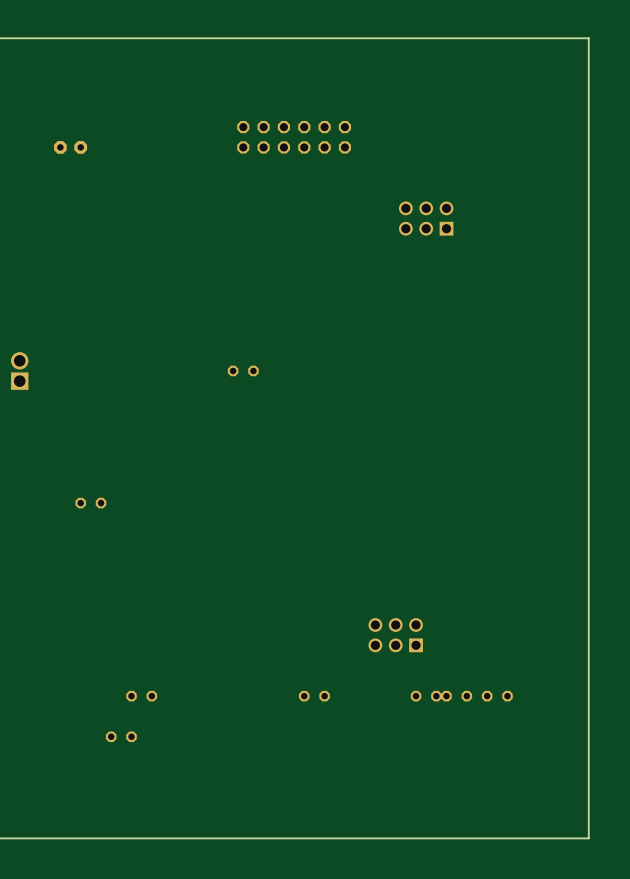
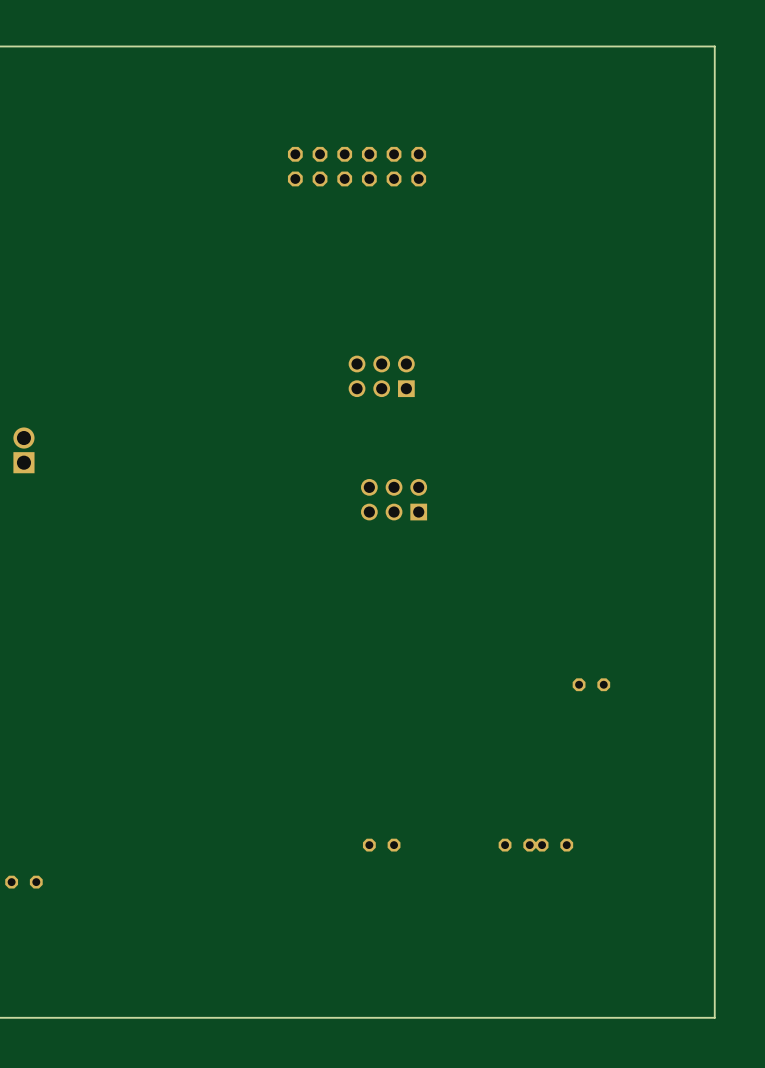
part: (70, 147) -> none
part: (426, 218) -> none
part: none -> (381, 376)
part: (243, 370) -> none
part: none -> (394, 499)
part: (90, 503) -> none
part: (395, 635) -> none
part: (141, 696) -> none
part position: (497, 696) -> (591, 684)
part: none -> (23, 882)
part: (121, 736) -> none

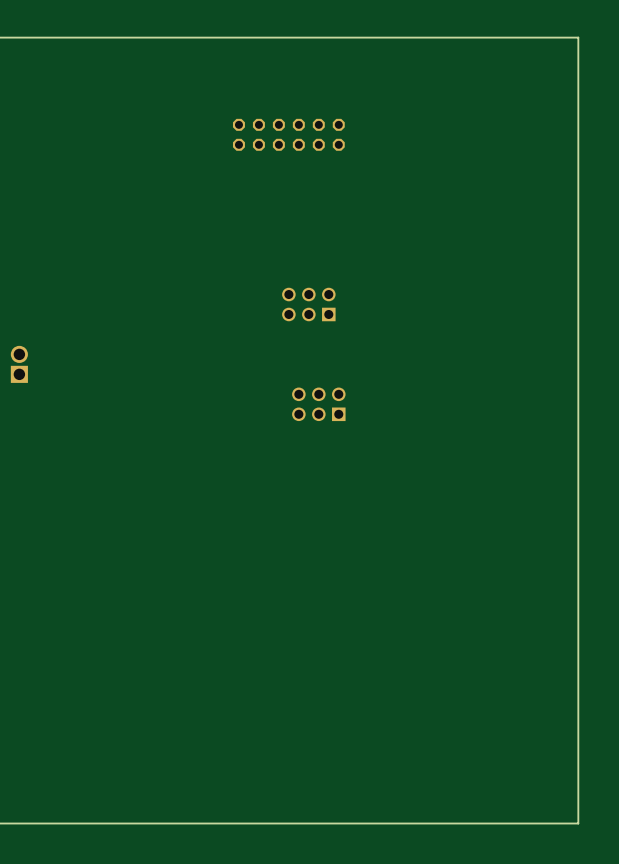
part: (591, 684) -> none
part: (381, 845) -> none
part: (517, 845) -> none
part: (554, 845) -> none
part: (23, 882) -> none

